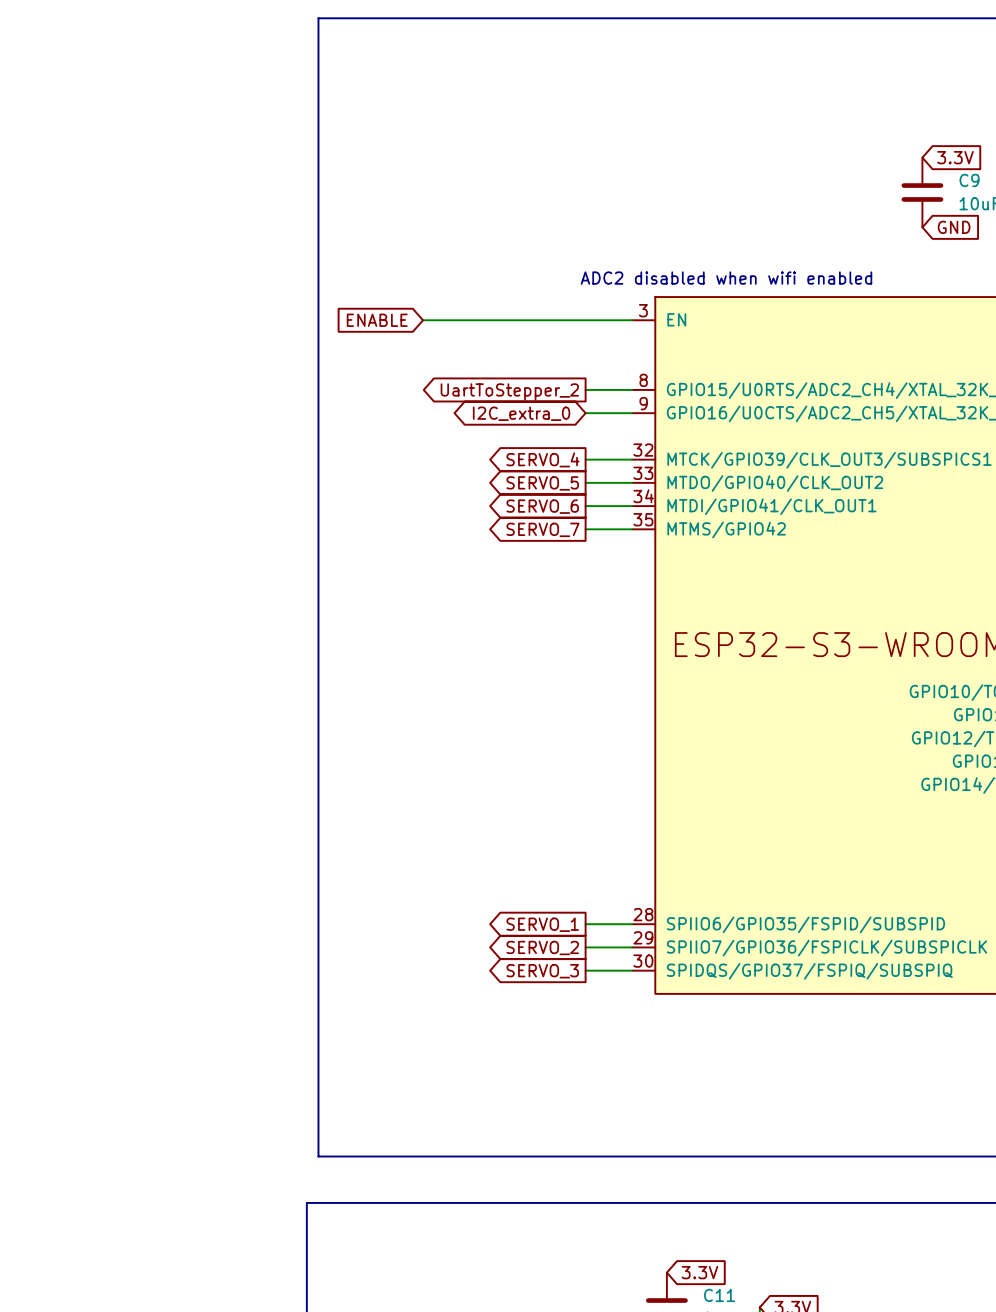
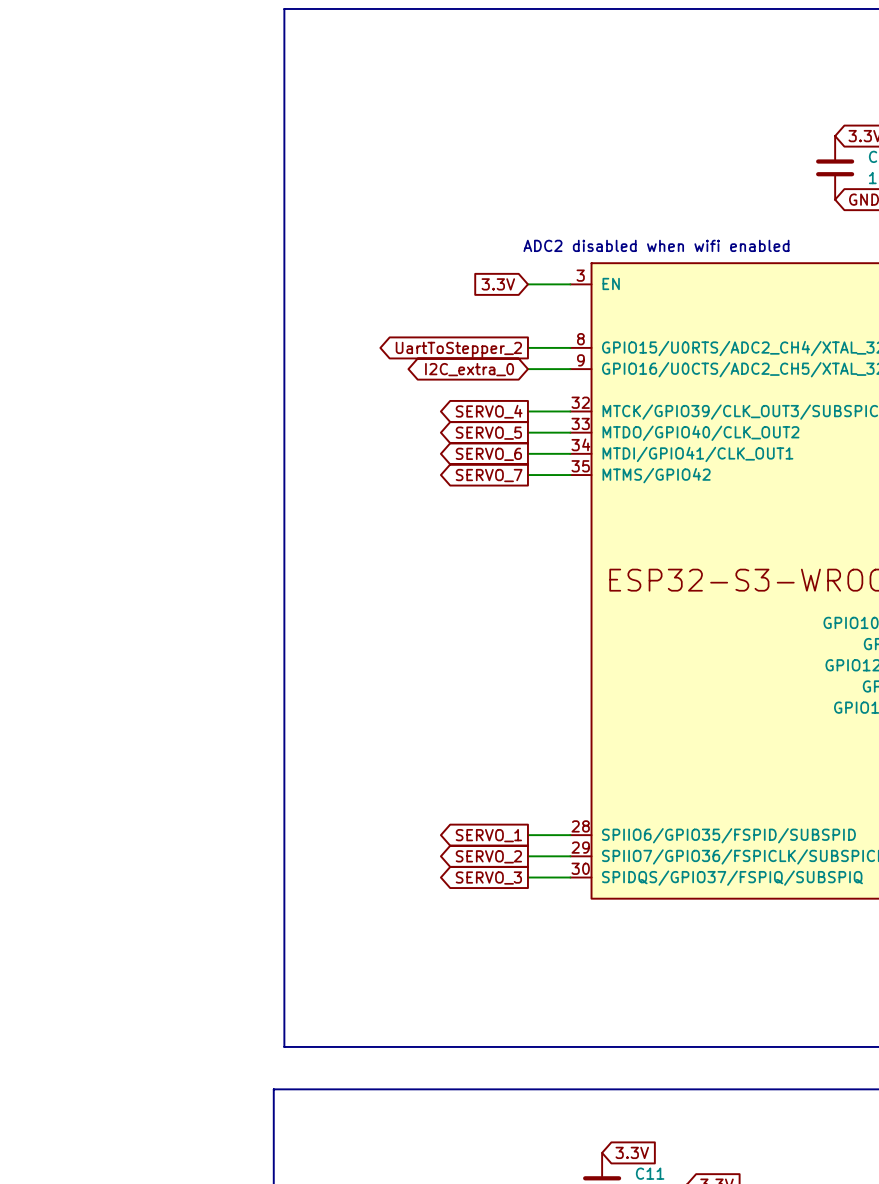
global label: ENABLE (377, 320) -> none
wire: (423, 320) (585, 320) -> none
global label: none -> 3.3V (498, 284)

